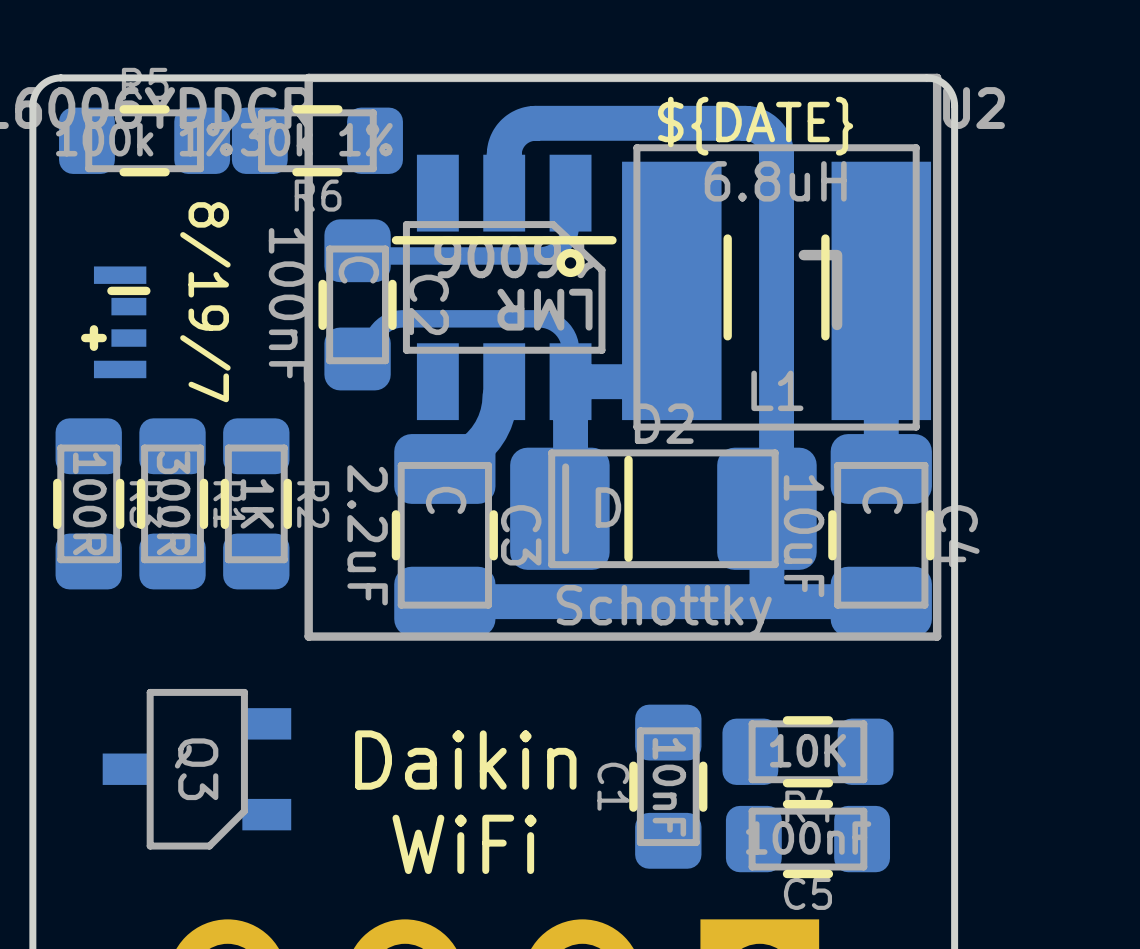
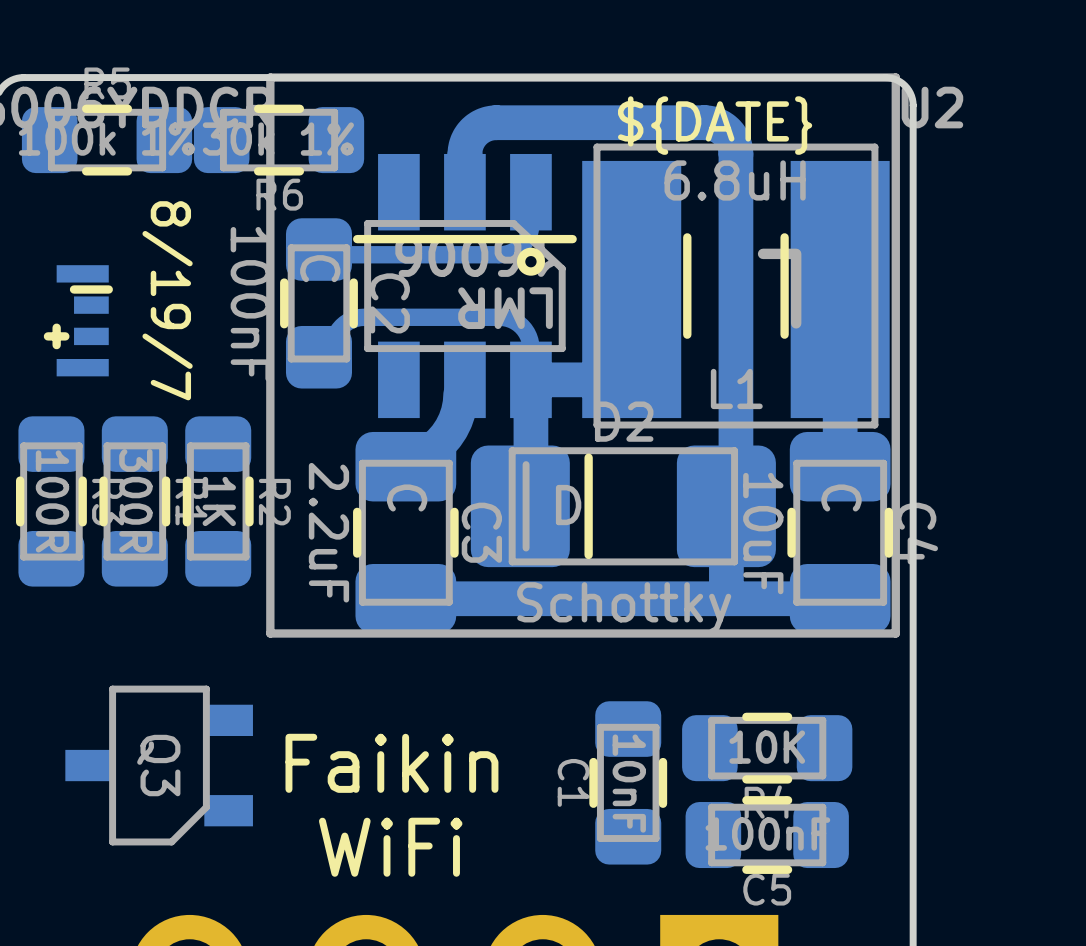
text: Daikin (465, 760) -> Faikin (391, 763)
text position: WiFi (464, 844) -> WiFi (390, 847)

